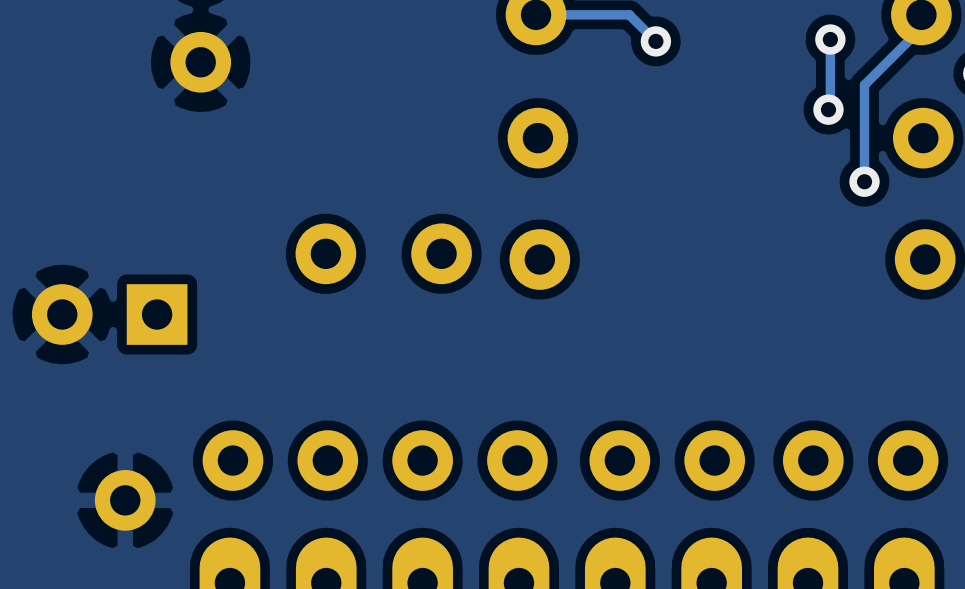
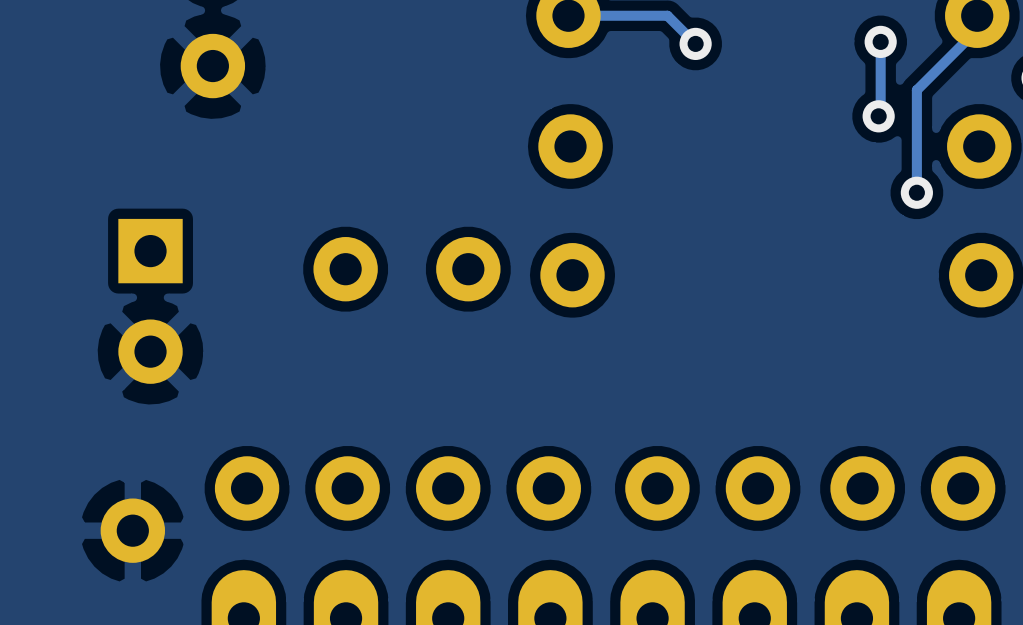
part rotation: 0° (109, 314) -> 90° counterclockwise (150, 301)

